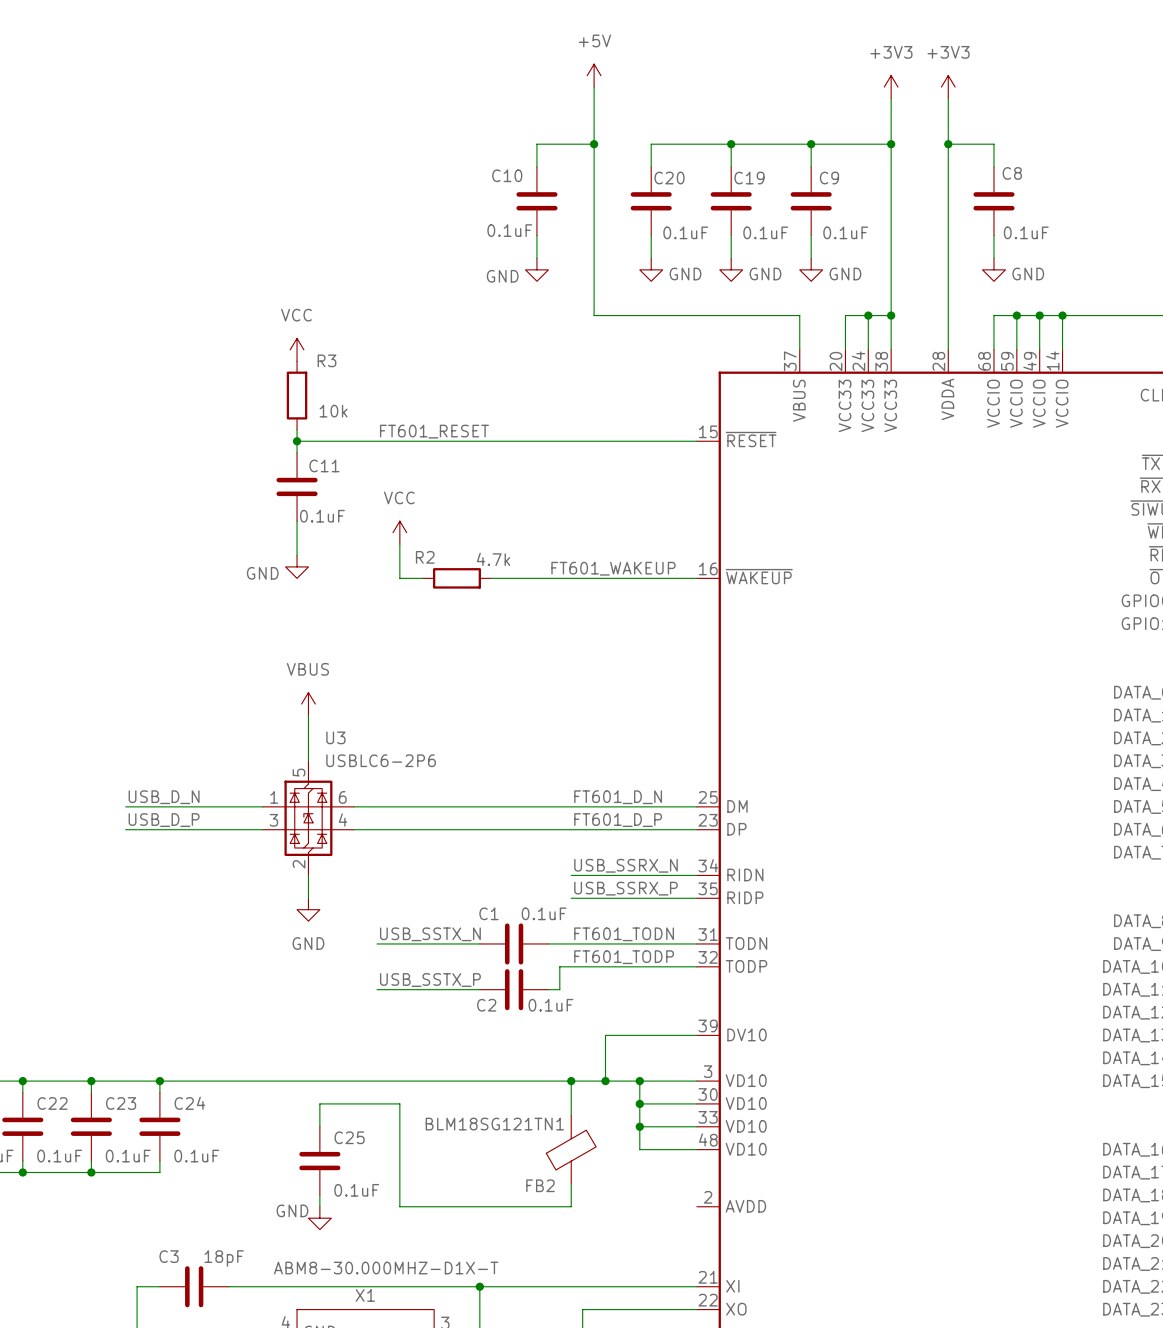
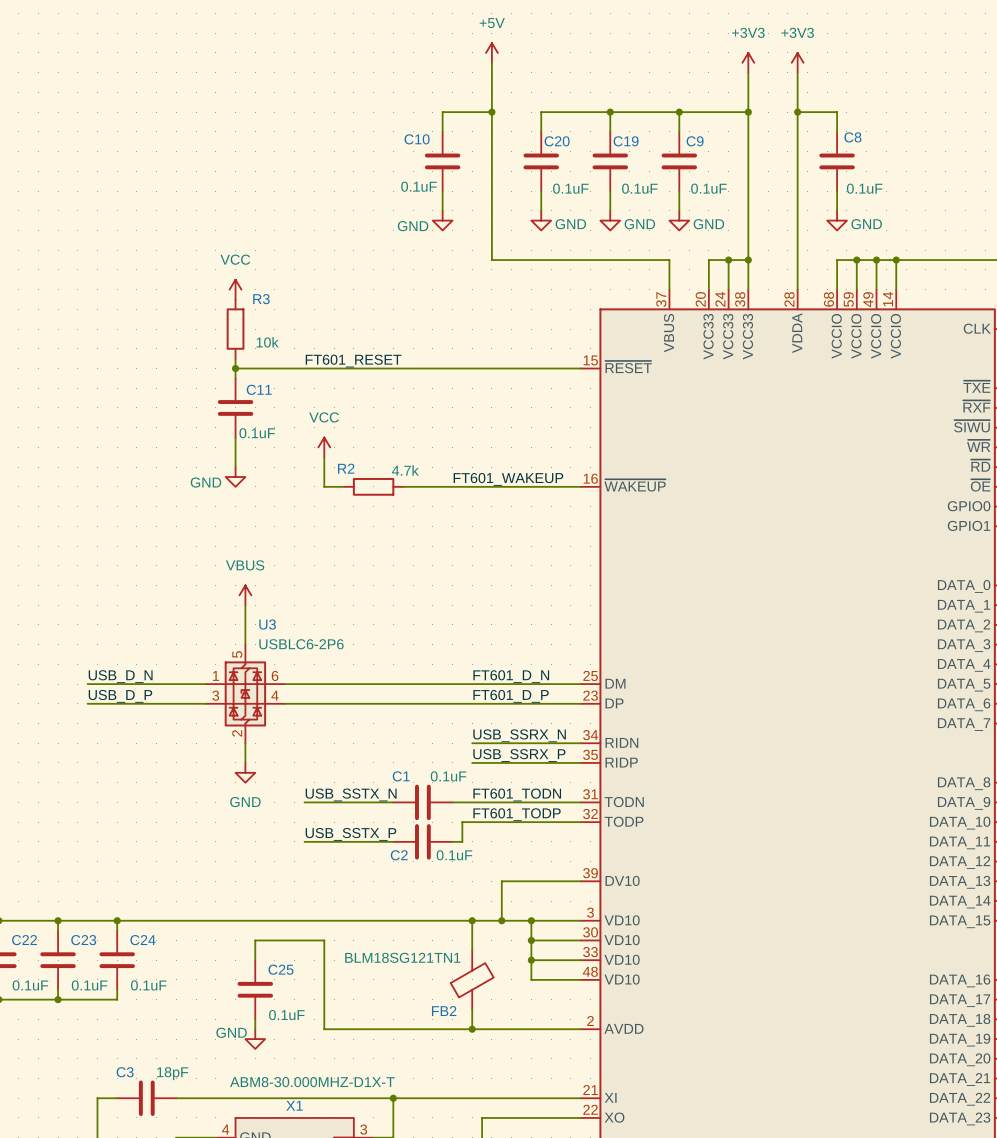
wire: none -> (472, 1029) (580, 1029)
junction: none -> (472, 1029)

